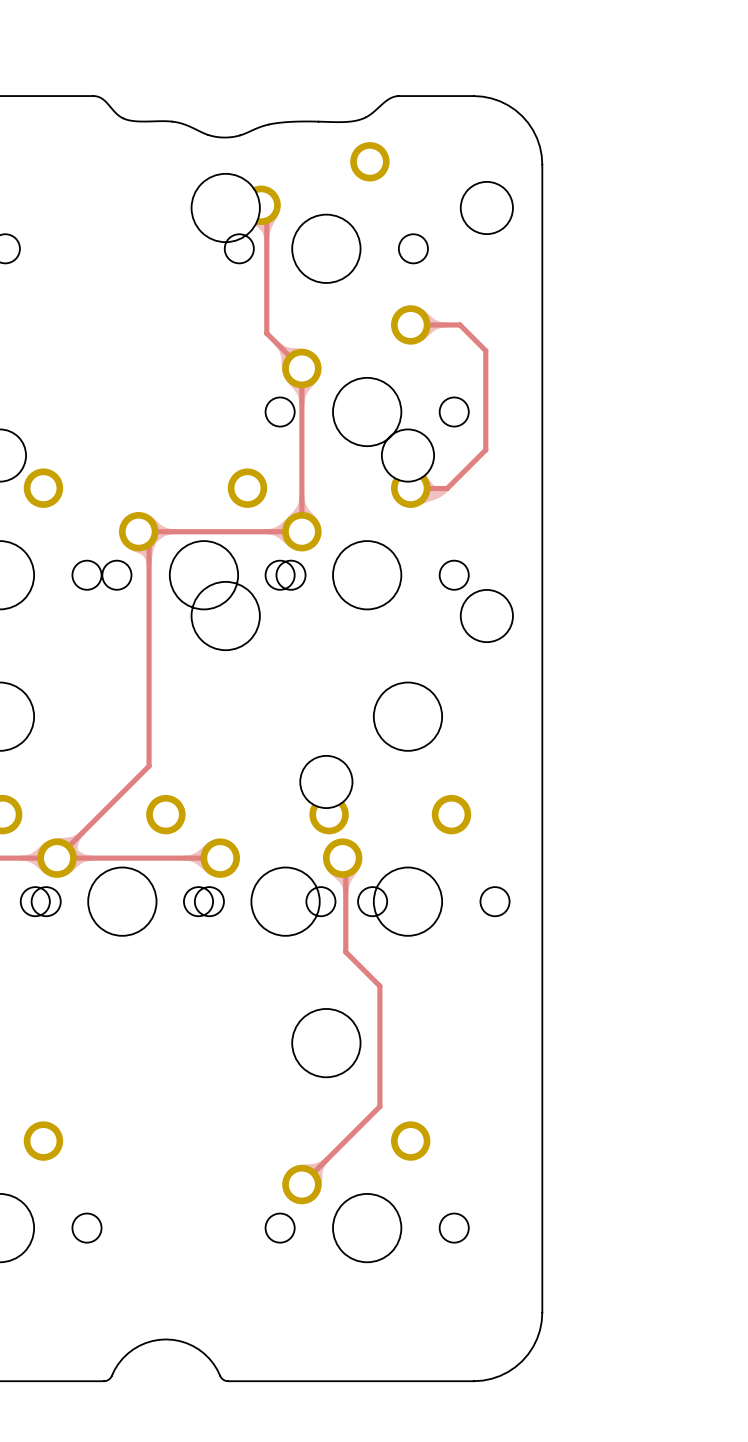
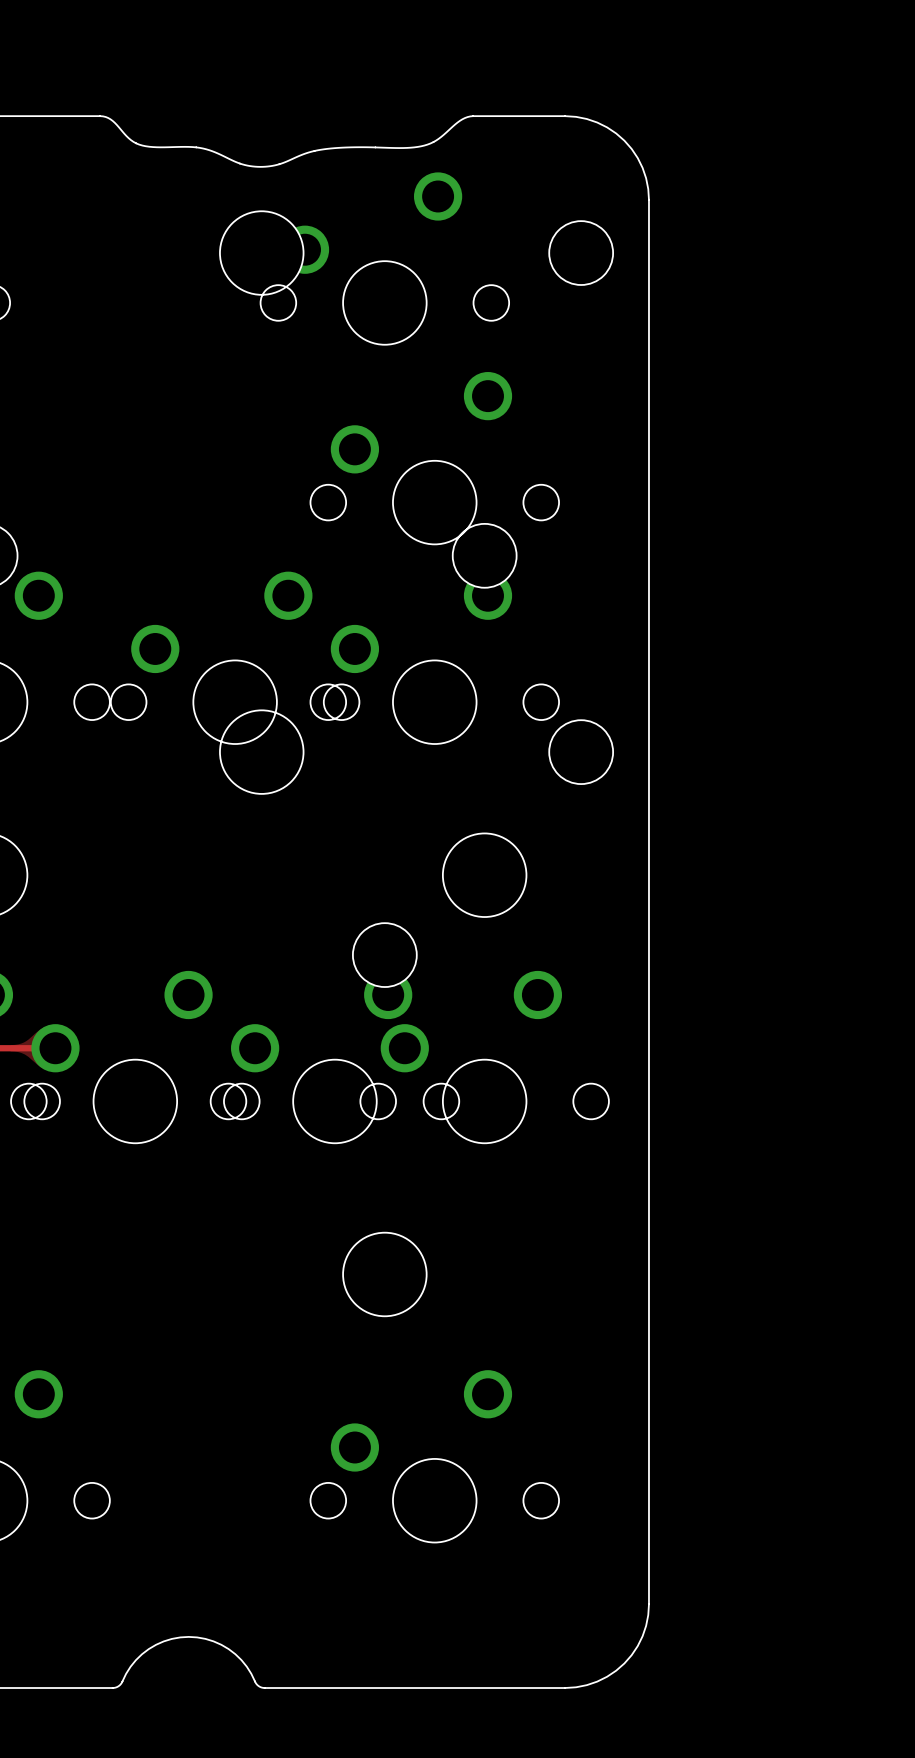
track: (266, 205) (266, 333) (301, 368) (301, 531) (138, 531) (149, 542) (149, 766) (57, 858) (220, 858) -> none
track: (410, 324) (459, 324) (485, 350) (485, 449) (447, 488) (410, 488) -> none
track: (342, 858) (345, 861) (345, 952) (379, 986) (379, 1106) (301, 1184) -> none

